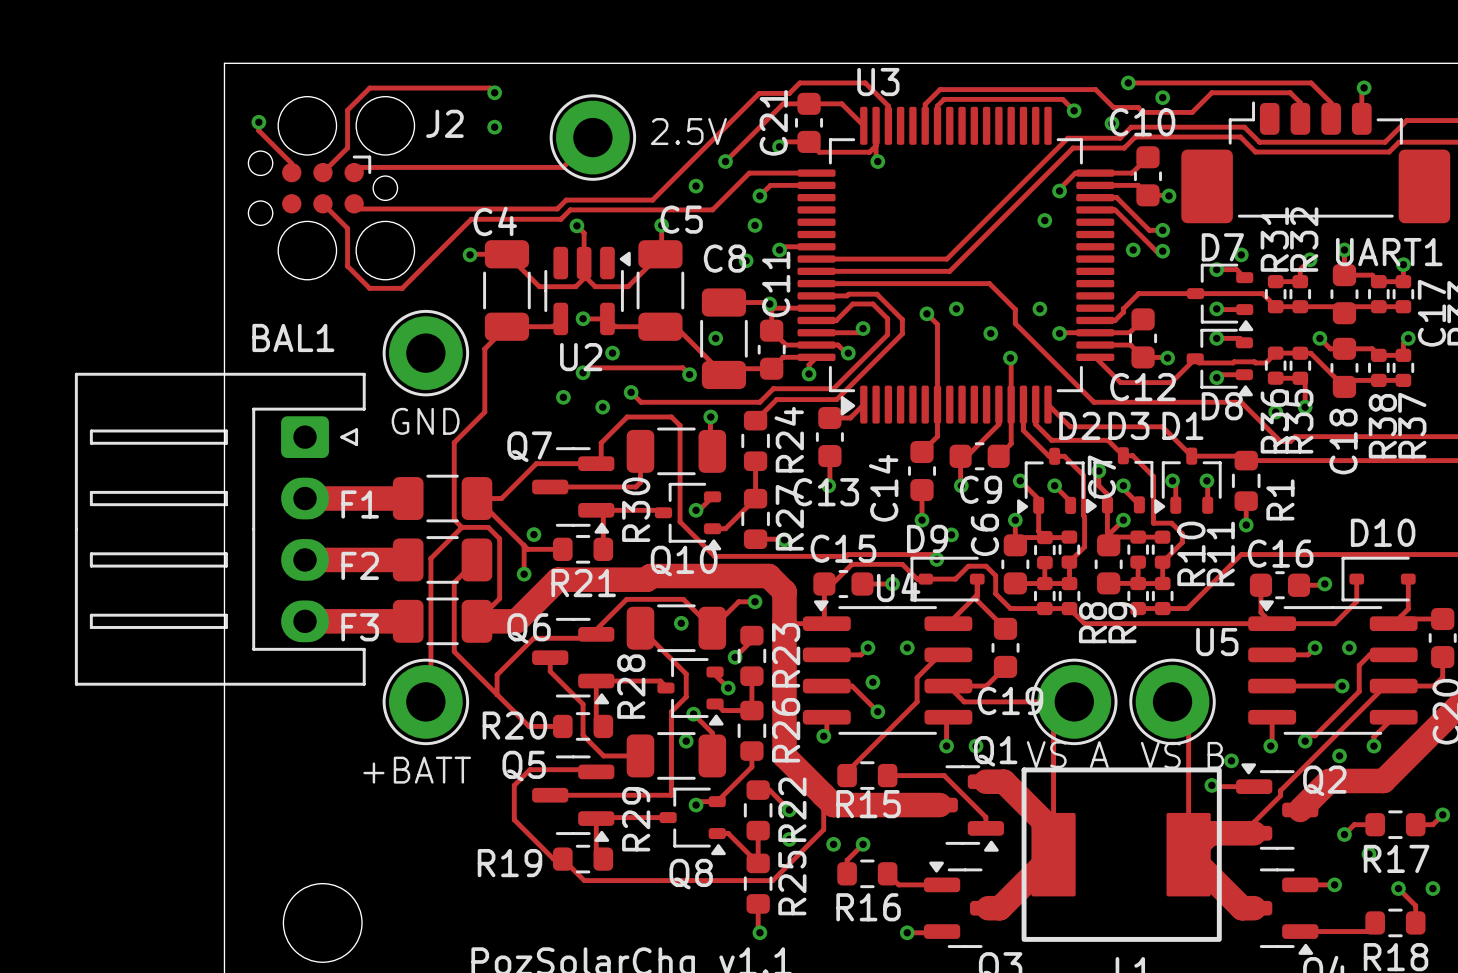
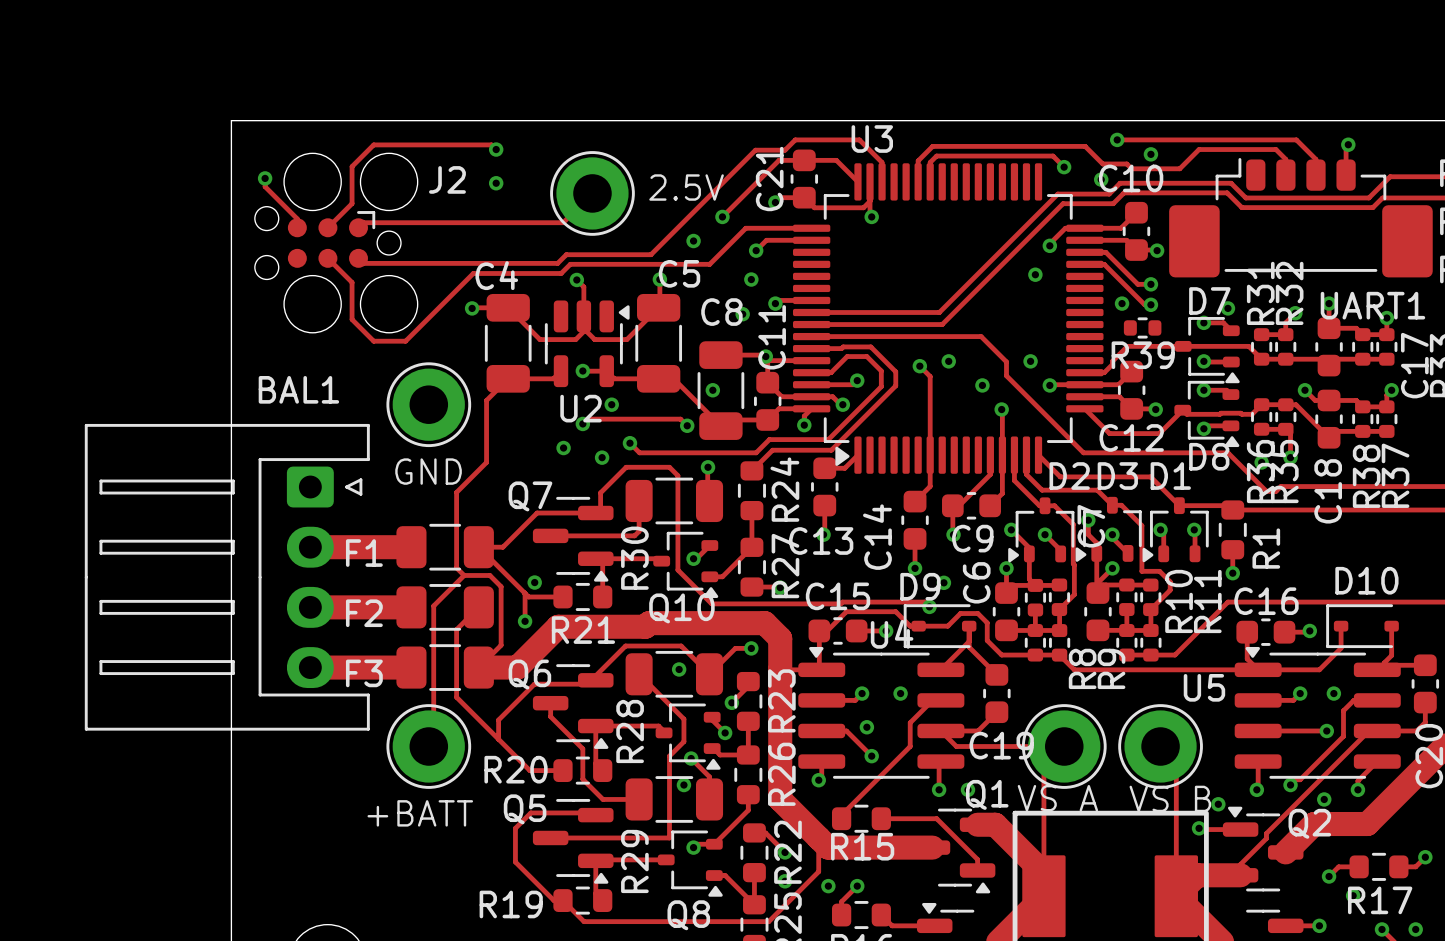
R39: none -> (1142, 327)

